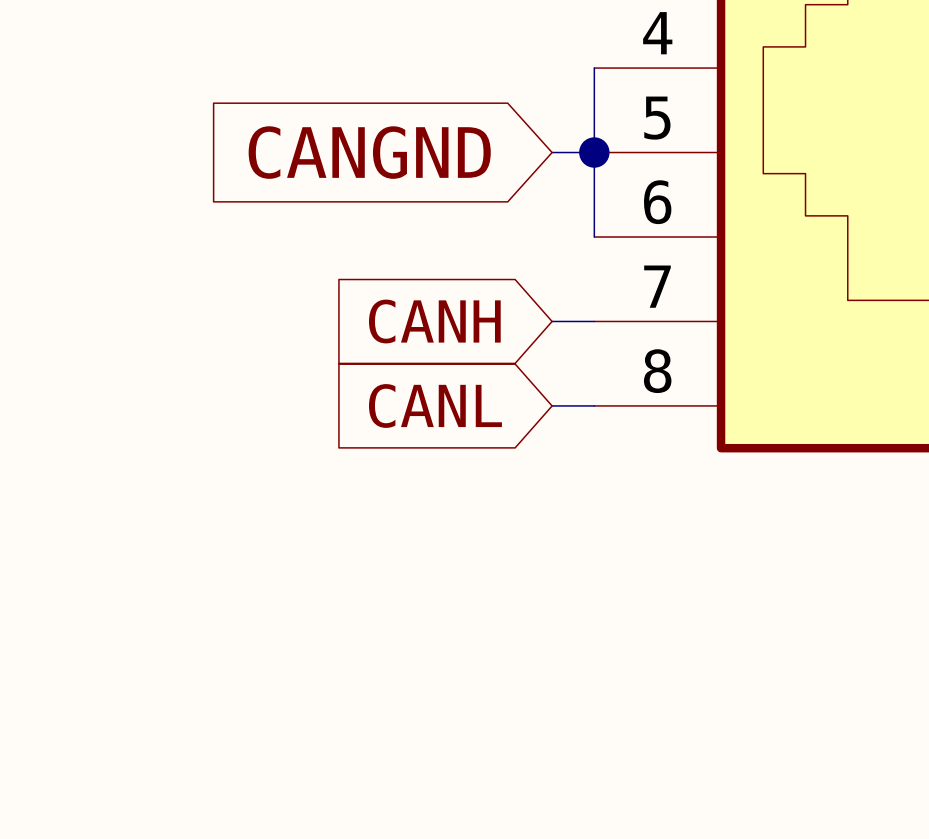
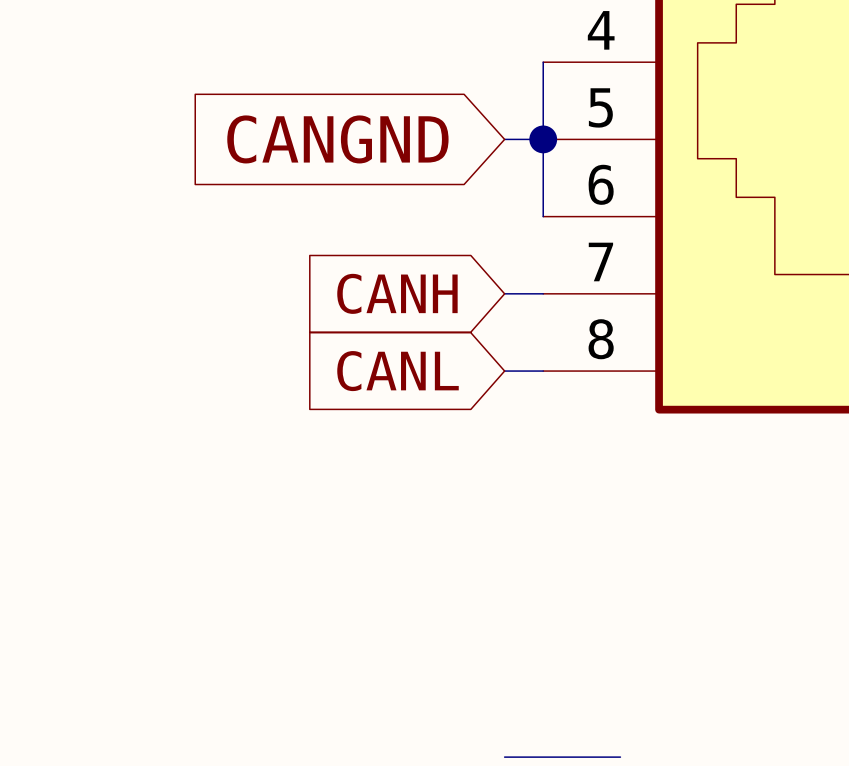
wire: none -> (504, 757) (620, 757)

